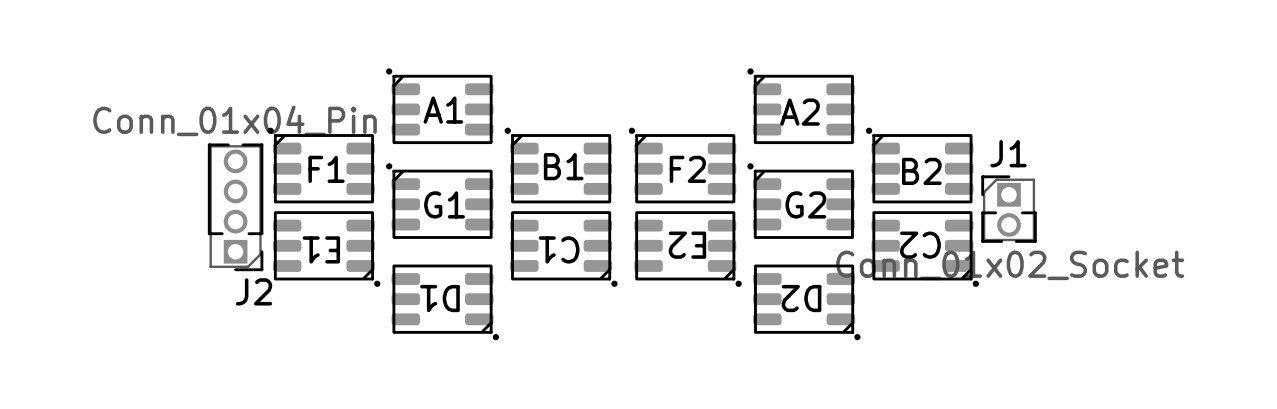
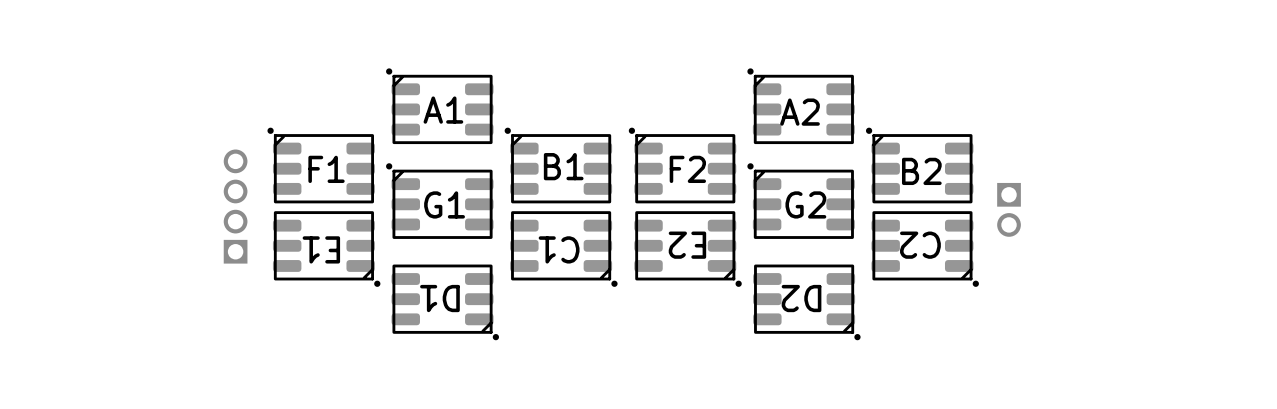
J2 side: top (235, 207) -> bottom (235, 206)
J1 side: top (1009, 209) -> bottom (1009, 209)

